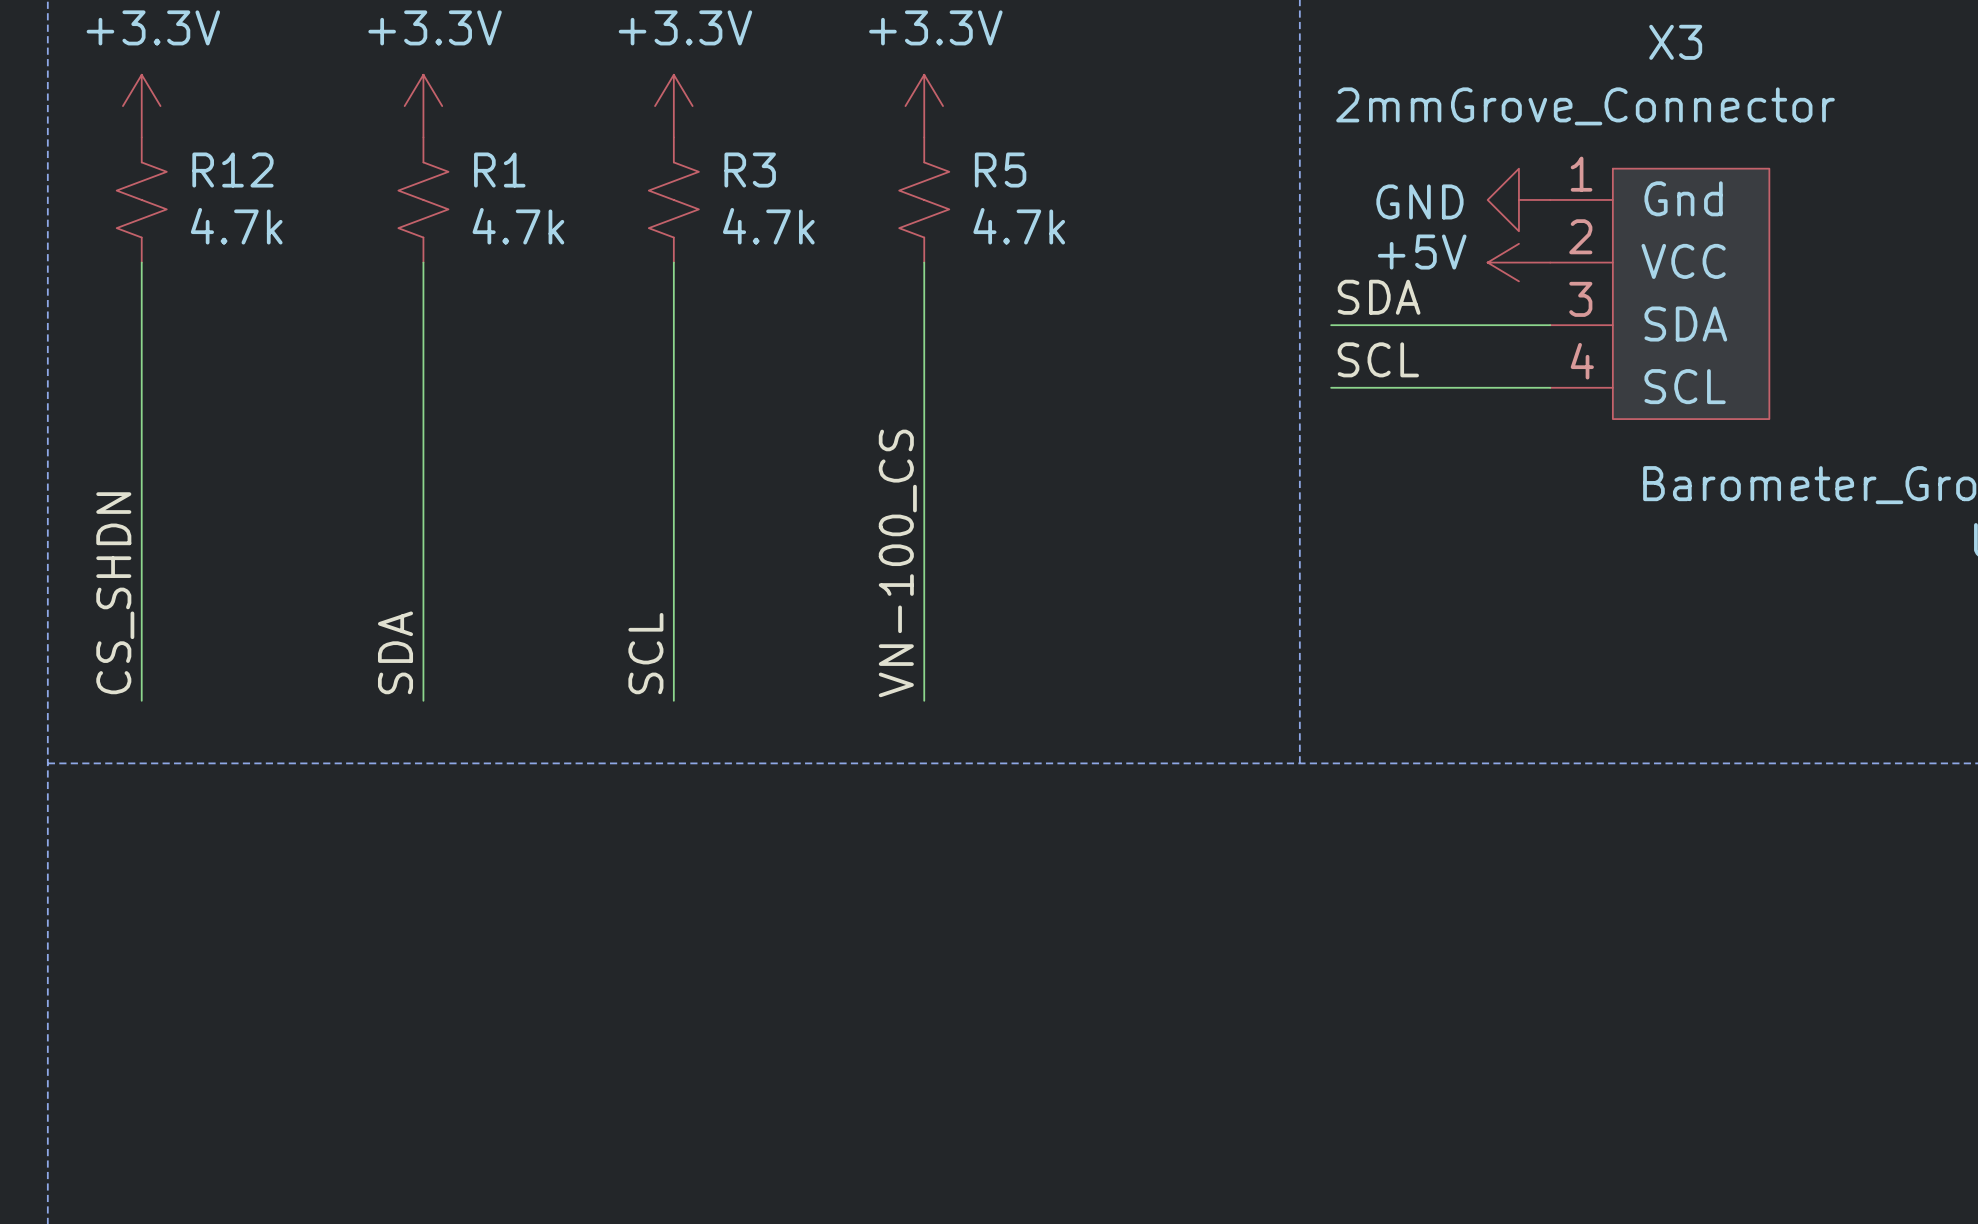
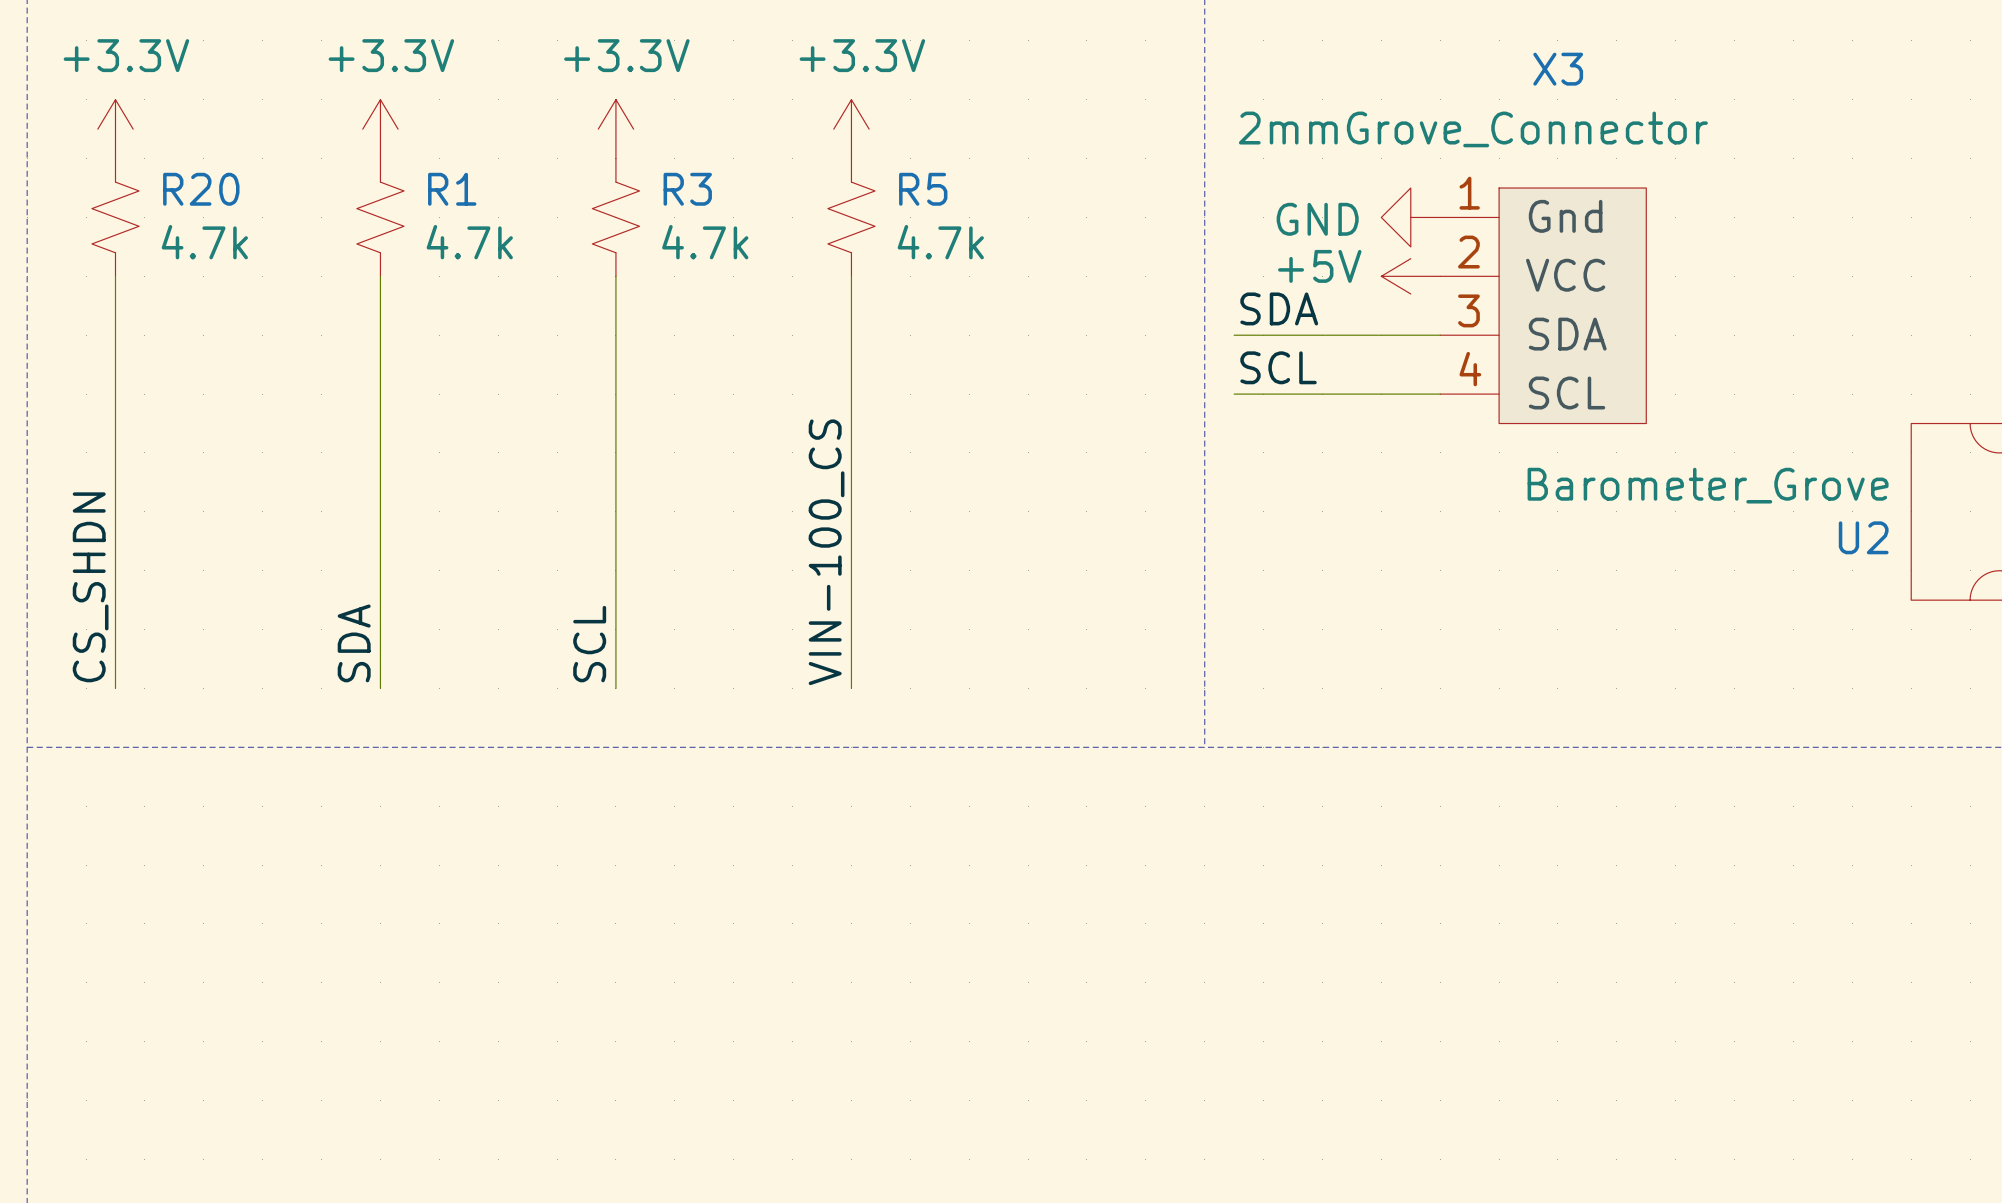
R12 name: R12 (232, 170) -> R20 (201, 189)
label: VN-100_CS (897, 563) -> VIN-100_CS (826, 552)

